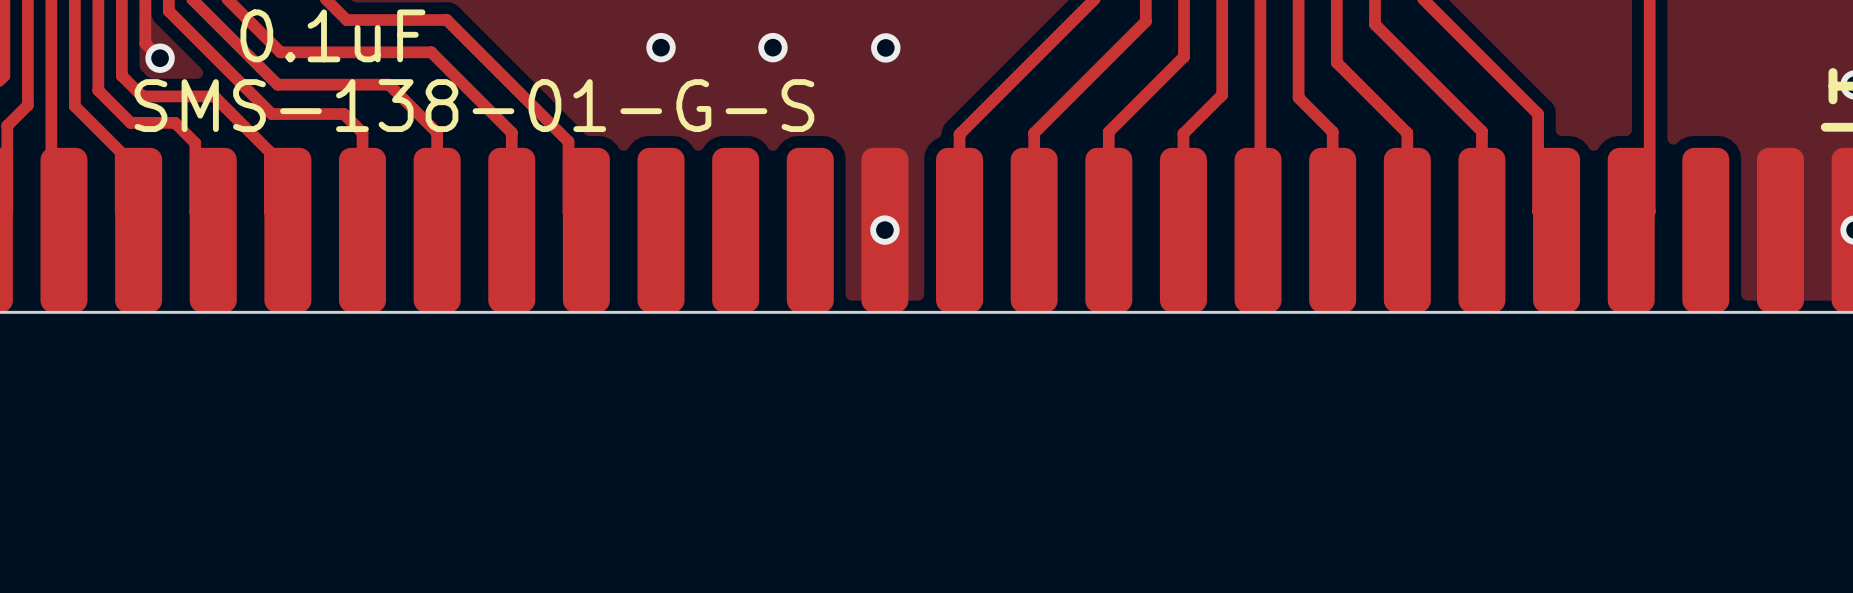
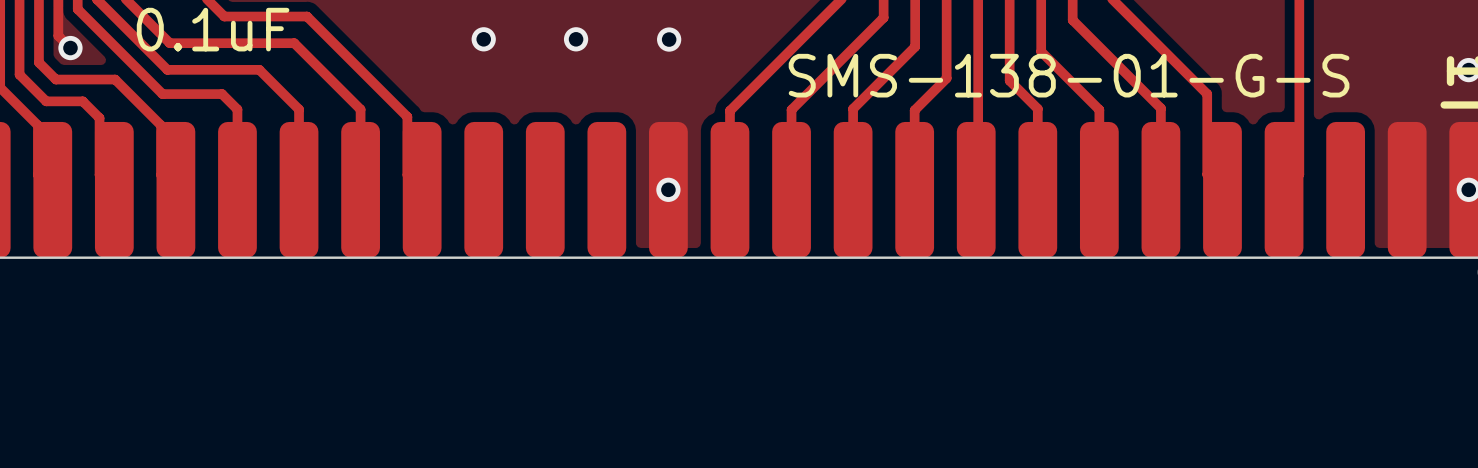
part value position: SMS-138-01-G-S (474, 105) -> SMS-138-01-G-S (1069, 75)

